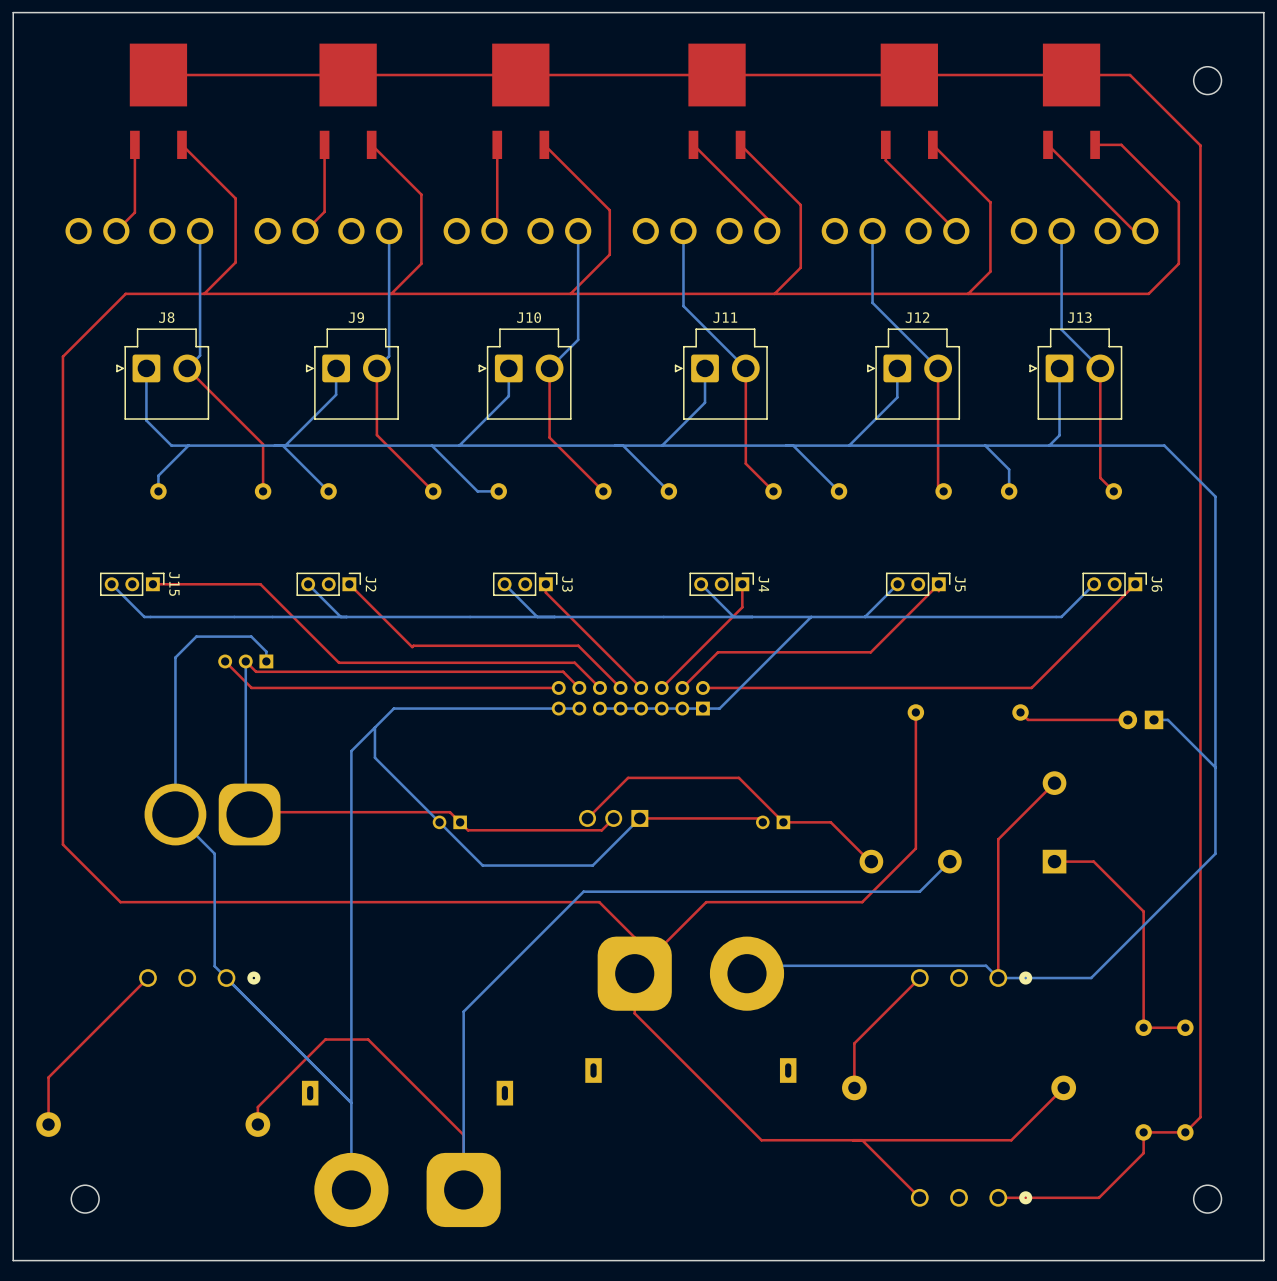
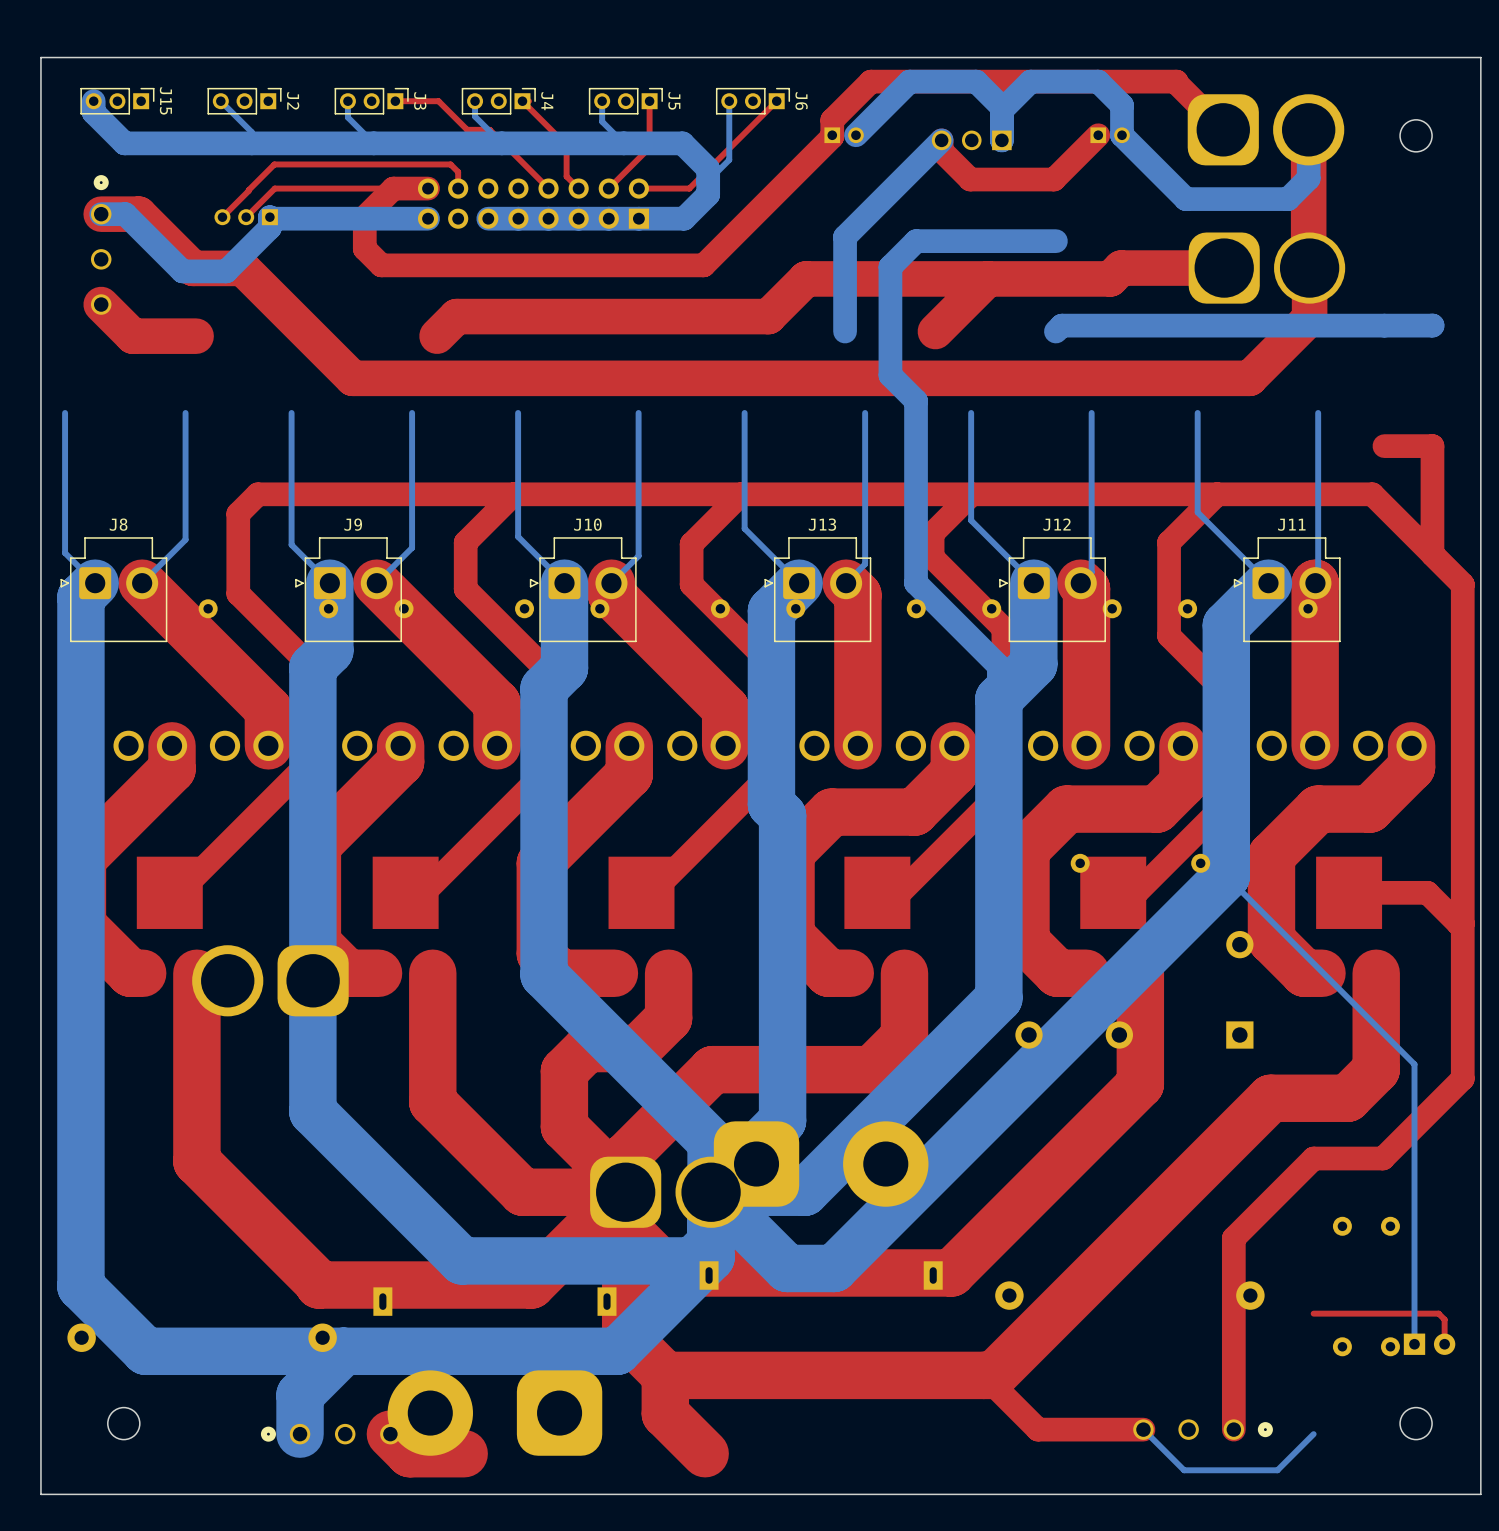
bottom track: none -> (93, 101) (93, 112) (124, 143) (682, 143) (708, 168) (708, 194) (684, 218) (488, 218)
bottom track: none -> (220, 101) (251, 132) (251, 143)
bottom track: none -> (347, 101) (347, 117) (373, 143)
top track: none -> (395, 101) (438, 101) (467, 129) (489, 129) (548, 188)
bottom track: none -> (475, 101) (475, 116) (501, 143)
top track: none -> (528, 101) (522, 101) (566, 145) (566, 176) (578, 188)
bottom track: none -> (602, 101) (602, 121) (623, 143)
top track: none -> (649, 101) (649, 147) (608, 188)
bottom track: none -> (729, 101) (729, 159) (708, 181)
top track: none -> (776, 101) (689, 188) (638, 188)
bottom track: none -> (1001, 110) (1030, 81) (1098, 81) (1121, 105) (1121, 135) (1185, 199) (1288, 199) (1308, 178) (1308, 129)
top track: (158, 75) (1130, 75) (1200, 145) (1200, 1117) (1185, 1132) (1143, 1132) (1143, 1153) (1099, 1197) (998, 1197) -> none
top track: none -> (1223, 129) (1176, 81) (870, 81) (832, 120) (832, 136) (703, 265) (381, 265) (364, 248) (364, 217) (393, 188) (428, 188)
part: none -> (1265, 129)
top track: none -> (1308, 129) (1309, 318) (1249, 378) (352, 378) (242, 268) (193, 268) (138, 214) (101, 214)
part: none -> (844, 135)
bottom track: none -> (855, 135) (909, 81) (976, 81) (1001, 107) (1001, 140)
top track: none -> (1098, 135) (1053, 179) (970, 179) (941, 150) (941, 140)
part: none -> (1110, 135)
bottom track: none -> (941, 140) (845, 236) (845, 331)
part: none -> (971, 140)
part: (158, 101) -> none
part: (348, 101) -> none
part: (520, 101) -> none
part: (717, 101) -> none
part: (909, 101) -> none
part: (1071, 101) -> none
top track: none -> (399, 188) (274, 188) (246, 217)
top track: none -> (458, 188) (458, 171) (450, 164) (274, 164) (222, 217)
part: none -> (533, 203)
top track: (134, 144) (134, 212) (116, 231) -> none
top track: (181, 144) (235, 198) (235, 262) (204, 293) -> none
top track: (324, 144) (324, 211) (305, 231) -> none
top track: (371, 144) (421, 194) (421, 263) (391, 293) -> none
top track: (497, 144) (497, 228) (494, 231) -> none
top track: (544, 144) (609, 210) -> none
top track: (693, 144) (767, 218) (767, 231) -> none
top track: (740, 144) (800, 205) (800, 267) (774, 293) -> none
top track: (885, 144) (885, 160) (956, 231) -> none
top track: (932, 144) (990, 202) -> none
top track: (1047, 144) (1134, 231) (1145, 231) -> none
top track: (1095, 144) (1121, 144) (1178, 202) (1178, 263) (1148, 293) (125, 293) (62, 356) (62, 844) (120, 902) (599, 902) (634, 937) (634, 1013) (761, 1140) (1011, 1140) (1063, 1087) -> none
bottom track: none -> (101, 214) (125, 214) (182, 271) (226, 271) (269, 227) (269, 217) (428, 218)
part: none -> (246, 217)
bottom track: none -> (1055, 241) (916, 241) (890, 266) (890, 375) (916, 400) (916, 583) (998, 666) (998, 699)
part: none -> (101, 244)
top track: none -> (1224, 268) (1121, 268) (1110, 278) (806, 278) (768, 316) (456, 316) (437, 336)
part: none -> (1266, 268)
top track: (990, 202) (990, 271) (968, 293) -> none
top track: none -> (988, 278) (935, 331)
top track: (609, 210) (609, 254) (570, 293) -> none
top track: none -> (101, 304) (132, 336) (196, 336)
part: (139, 231) -> none
bottom track: (200, 231) (200, 355) (187, 368) -> none
part: (328, 231) -> none
bottom track: (389, 231) (389, 356) (376, 368) -> none
part: (517, 231) -> none
bottom track: (578, 231) (578, 339) (549, 368) -> none
bottom track: (683, 231) (683, 306) (745, 368) -> none
part: (706, 231) -> none
bottom track: (872, 231) (872, 302) (938, 368) -> none
part: (895, 231) -> none
bottom track: (1061, 231) (1061, 329) (1100, 368) -> none
part: (1084, 231) -> none
bottom track: none -> (1432, 325) (1061, 325) (1055, 331)
bottom track: none -> (185, 412) (185, 539) (142, 583)
bottom track: none -> (291, 412) (291, 544) (329, 583) (329, 650) (312, 667) (312, 1111) (461, 1260) (692, 1260) (711, 1242)
bottom track: none -> (412, 412) (412, 547) (376, 583)
bottom track: none -> (518, 412) (518, 536) (564, 583) (564, 668) (544, 688) (544, 974) (711, 1141) (711, 1257) (617, 1351) (145, 1351) (80, 1286) (80, 597) (95, 583) (65, 553) (65, 412)
bottom track: none -> (638, 412) (638, 556) (611, 583)
bottom track: none -> (744, 412) (744, 528) (799, 583) (771, 610) (771, 804) (782, 815) (782, 1120) (711, 1192)
bottom track: none -> (865, 412) (865, 564) (846, 583)
bottom track: none -> (971, 412) (971, 520) (1033, 583) (1033, 664) (998, 699)
bottom track: none -> (1091, 412) (1091, 572) (1080, 583)
bottom track: none -> (1197, 412) (1197, 512) (1268, 583) (1226, 625) (1226, 876)
bottom track: none -> (1318, 412) (1318, 580) (1315, 583)
top track: none -> (1384, 446) (1432, 446) (1432, 554)
bottom track: (146, 368) (146, 420) (171, 445) (1164, 445) (1215, 496) (1215, 853) (1091, 978) (998, 978) (986, 965) (754, 965) (747, 973) -> none
top track: (187, 368) (263, 444) (263, 491) -> none
bottom track: (336, 368) (336, 394) (285, 445) -> none
top track: (376, 368) (376, 435) (433, 491) -> none
bottom track: (508, 368) (508, 396) (459, 445) -> none
top track: (549, 368) (549, 437) (603, 491) -> none
bottom track: (705, 368) (705, 402) (662, 445) -> none
top track: (745, 368) (745, 463) (773, 491) -> none
bottom track: (897, 368) (897, 397) (849, 445) -> none
top track: (938, 368) (938, 485) (943, 491) -> none
bottom track: (1059, 368) (1059, 435) (1049, 445) -> none
top track: (1100, 368) (1100, 477) (1113, 491) -> none
J8 position: (162, 374) -> (113, 589)
J9 position: (352, 374) -> (348, 589)
J10 position: (525, 374) -> (583, 589)
J11 position: (721, 374) -> (1287, 589)
J12 position: (913, 374) -> (1052, 589)
J13 position: (1075, 374) -> (817, 589)
top track: none -> (513, 494) (465, 542) (465, 589) (550, 673) (550, 766) (424, 892) (405, 892)
top track: none -> (741, 494) (691, 544) (691, 584) (771, 664) (771, 772) (651, 892) (641, 892)
top track: none -> (971, 494) (932, 533) (932, 557) (1003, 628) (1003, 789) (900, 892) (877, 892)
top track: none -> (1217, 494) (1169, 542) (1169, 635) (1233, 700) (1233, 795) (1136, 892) (1113, 892)
bottom track: (188, 445) (158, 475) (158, 491) -> none
bottom track: (282, 445) (328, 491) -> none
bottom track: (431, 445) (477, 491) (498, 491) -> none
bottom track: (623, 445) (668, 491) -> none
bottom track: (793, 445) (839, 491) -> none
bottom track: (985, 445) (1009, 469) (1009, 491) -> none
top track: none -> (142, 583) (268, 709) (268, 745)
top track: none -> (376, 583) (497, 703) (497, 745)
top track: none -> (611, 583) (611, 594) (725, 708) (725, 745)
top track: none -> (846, 583) (857, 594) (857, 745)
top track: none -> (1080, 583) (1086, 588) (1086, 745)
top track: none -> (1315, 583) (1315, 745)
bottom track: none -> (998, 699) (998, 998) (804, 1192) (711, 1192)
J15 position: (132, 584) -> (117, 101)
top track: (152, 584) (260, 584) (338, 662) (574, 662) (599, 687) -> none
bottom track: (308, 584) (340, 616) -> none
J2 position: (328, 584) -> (244, 101)
top track: (349, 584) (412, 647) (578, 645) (620, 687) -> none
bottom track: (504, 584) (537, 616) -> none
J3 position: (525, 584) -> (371, 101)
top track: (545, 584) (545, 592) (641, 687) -> none
bottom track: (701, 584) (733, 616) -> none
J4 position: (721, 584) -> (498, 101)
top track: (742, 584) (742, 607) (661, 687) -> none
bottom track: (897, 584) (865, 616) -> none
J5 position: (918, 584) -> (625, 101)
bottom track: (1094, 584) (1061, 616) (144, 616) (111, 584) -> none
J6 position: (1114, 584) -> (752, 101)
top track: (1135, 584) (1031, 687) (702, 687) -> none
top track: (938, 591) (938, 584) (870, 652) (718, 652) (682, 687) -> none
top track: none -> (172, 745) (172, 769) (82, 858) (82, 925) (130, 973) (142, 973)
part: none -> (198, 745)
top track: none -> (400, 745) (400, 762) (317, 845) (317, 943) (347, 973) (378, 973)
part: none -> (427, 745)
top track: none -> (629, 745) (629, 774) (540, 863) (540, 953) (559, 973) (614, 973)
part: none -> (655, 745)
part: none -> (884, 745)
top track: none -> (954, 745) (954, 772) (914, 812) (831, 812) (791, 852) (791, 935) (828, 973) (850, 973)
part: none -> (1113, 745)
top track: none -> (1182, 745) (1182, 783) (1157, 809) (1066, 809) (1025, 849) (1024, 940) (1057, 973) (1086, 973)
part: none -> (1341, 745)
top track: none -> (1411, 745) (1411, 767) (1369, 809) (1318, 809) (1271, 855) (1271, 940) (1304, 973) (1321, 973)
bottom track: (811, 616) (719, 708) (599, 708) -> none
top track: (225, 661) (251, 687) (558, 687) -> none
top track: (245, 661) (256, 671) (563, 671) (579, 687) -> none
part: (245, 661) -> none
bottom track: (266, 661) (266, 651) (251, 636) (196, 636) (175, 657) (175, 814) (214, 853) (214, 966) (351, 1102) -> none
part: (630, 698) -> none
bottom track: (579, 708) (393, 708) (351, 751) (351, 1189) -> none
top track: (915, 712) (915, 848) (862, 902) (706, 902) (634, 973) -> none
top track: (1020, 712) (1027, 719) (1127, 719) -> none
part: (1140, 719) -> none
bottom track: (1154, 719) (1167, 719) (1215, 767) -> none
bottom track: none -> (1226, 876) (834, 1268) (787, 1268) (711, 1192)
bottom track: none -> (1226, 876) (1414, 1064) (1414, 1344)
bottom track: (374, 727) (374, 757) (482, 865) (592, 865) (639, 818) -> none
top track: none -> (169, 892) (178, 892) (322, 748) (322, 678) (238, 593) (238, 513) (257, 494) (1372, 494) (1462, 584) (1462, 1078) (1382, 1158) (1313, 1158) (1233, 1238) (1233, 1429)
top track: none -> (1349, 892) (1427, 892) (1458, 923) (1462, 923)
part: none -> (169, 923)
part: none -> (405, 923)
part: none -> (641, 923)
part: none -> (877, 923)
part: none -> (1113, 923)
part: none -> (1349, 923)
top track: (1054, 783) (998, 839) (998, 978) -> none
top track: none -> (196, 973) (196, 1161) (318, 1285) (531, 1285) (624, 1192)
top track: none -> (432, 973) (432, 1102) (522, 1192) (625, 1192)
top track: none -> (668, 973) (668, 1018) (638, 1048) (586, 1048) (564, 1071) (564, 1126) (625, 1188)
top track: none -> (904, 973) (904, 1036) (871, 1069) (712, 1069) (625, 1156) (625, 1335) (665, 1375)
top track: none -> (1140, 973) (1140, 1084) (951, 1272) (670, 1272) (625, 1227)
top track: none -> (1376, 973) (1376, 1069) (1347, 1098) (1270, 1098) (993, 1375) (665, 1375)
top track: (249, 814) (251, 812) (449, 812) (468, 830) (601, 830) (613, 818) -> none
top track: (587, 818) (628, 777) (738, 777) (783, 822) (830, 822) (871, 861) -> none
part: (613, 818) -> none
part: (449, 822) -> none
top track: (762, 822) (758, 818) (639, 818) (643, 822) -> none
part: (773, 822) -> none
bottom track: (949, 861) (919, 891) (583, 891) (463, 1011) (463, 1189) -> none
top track: (1054, 861) (1093, 861) (1143, 911) (1143, 1027) (1185, 1027) -> none
top track: (147, 978) (48, 1077) (48, 1124) -> none
part rotation: 0° (199, 978) -> 180° (330, 1434)
part position: (199, 978) -> (330, 1434)
top track: (919, 978) (854, 1043) (854, 1087) -> none
part: (971, 978) -> none
part: none -> (668, 1192)
top track: none -> (1313, 1313) (1438, 1313) (1444, 1319) (1444, 1344)
top track: (257, 1124) (257, 1107) (325, 1039) (368, 1039) (463, 1135) (463, 1189) -> none
part: none -> (1429, 1344)
bottom track: none -> (343, 1351) (300, 1394) (300, 1434)
top track: (862, 1140) (919, 1197) -> none
top track: none -> (665, 1375) (665, 1413) (705, 1453)
top track: none -> (983, 1375) (1038, 1429) (1143, 1429)
part position: (971, 1197) -> (1203, 1429)
bottom track: none -> (1143, 1429) (1184, 1470) (1277, 1470) (1313, 1434)
top track: none -> (390, 1434) (409, 1453) (464, 1453)

